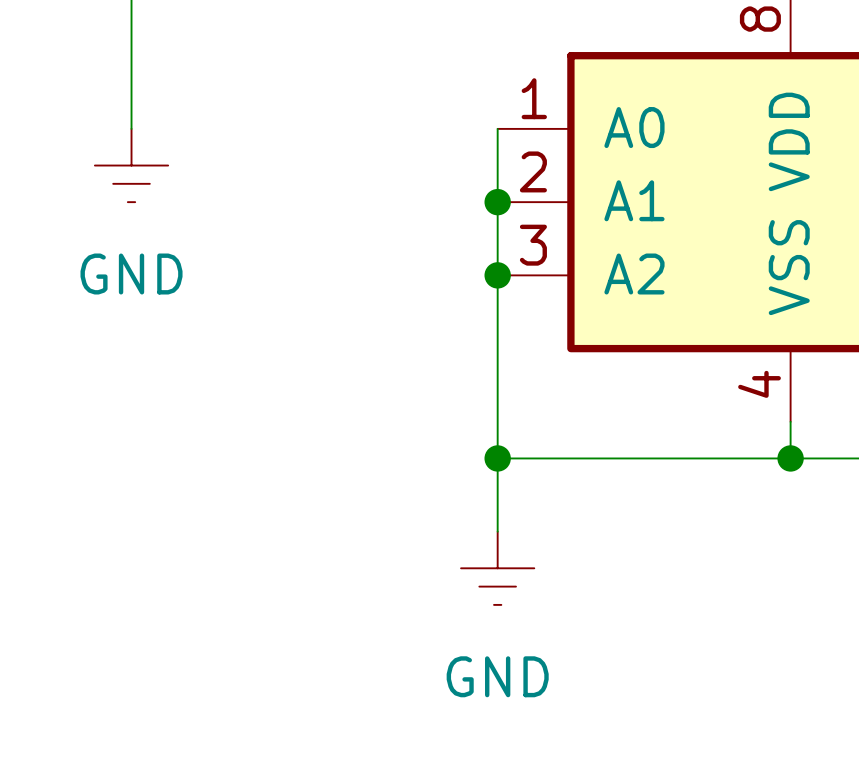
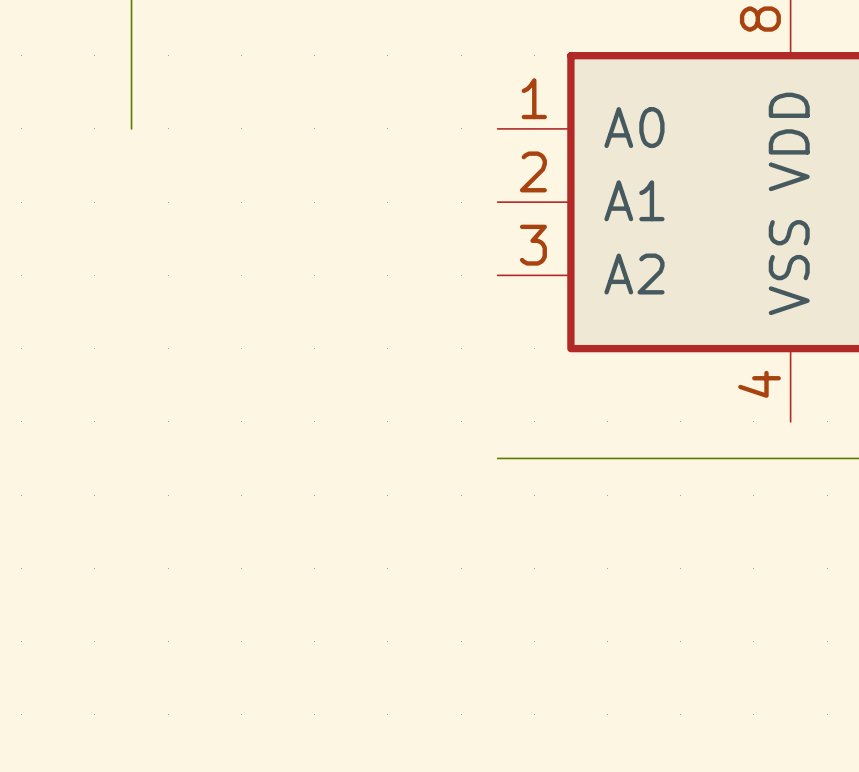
wire: (497, 128) (497, 531) -> none
power symbol: GND (131, 165) -> none
junction: (497, 202) -> none
junction: (497, 275) -> none
wire: (790, 421) (790, 458) -> none
junction: (497, 458) -> none
junction: (790, 458) -> none
power symbol: GND (497, 568) -> none

